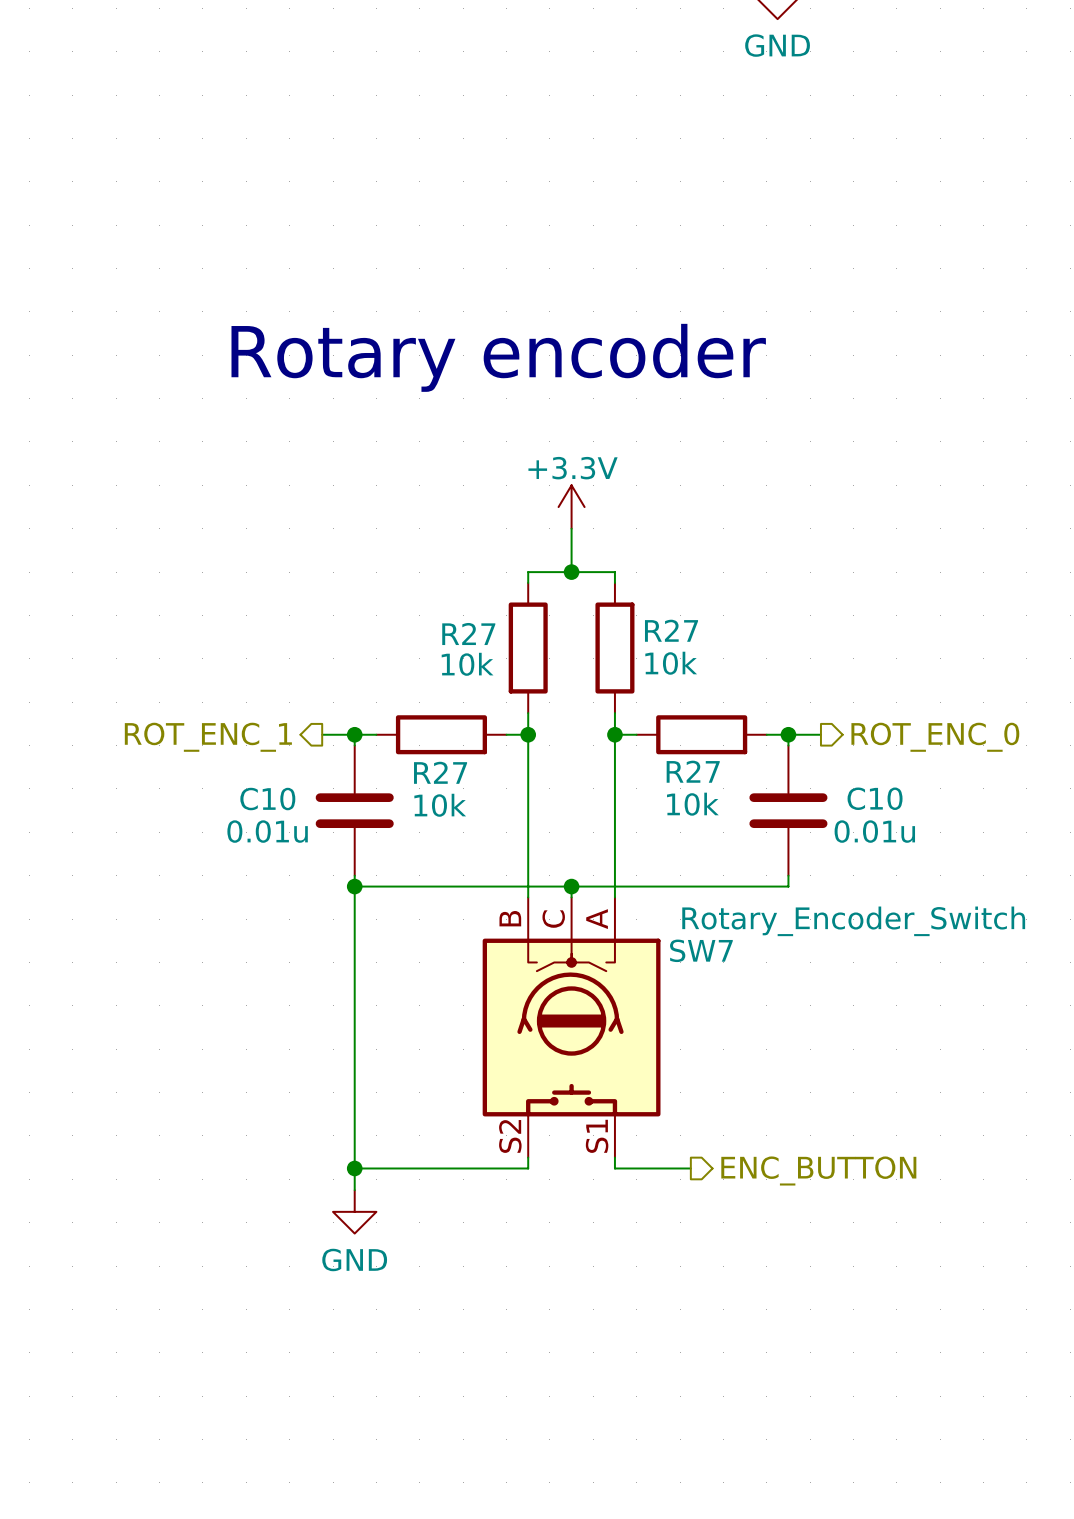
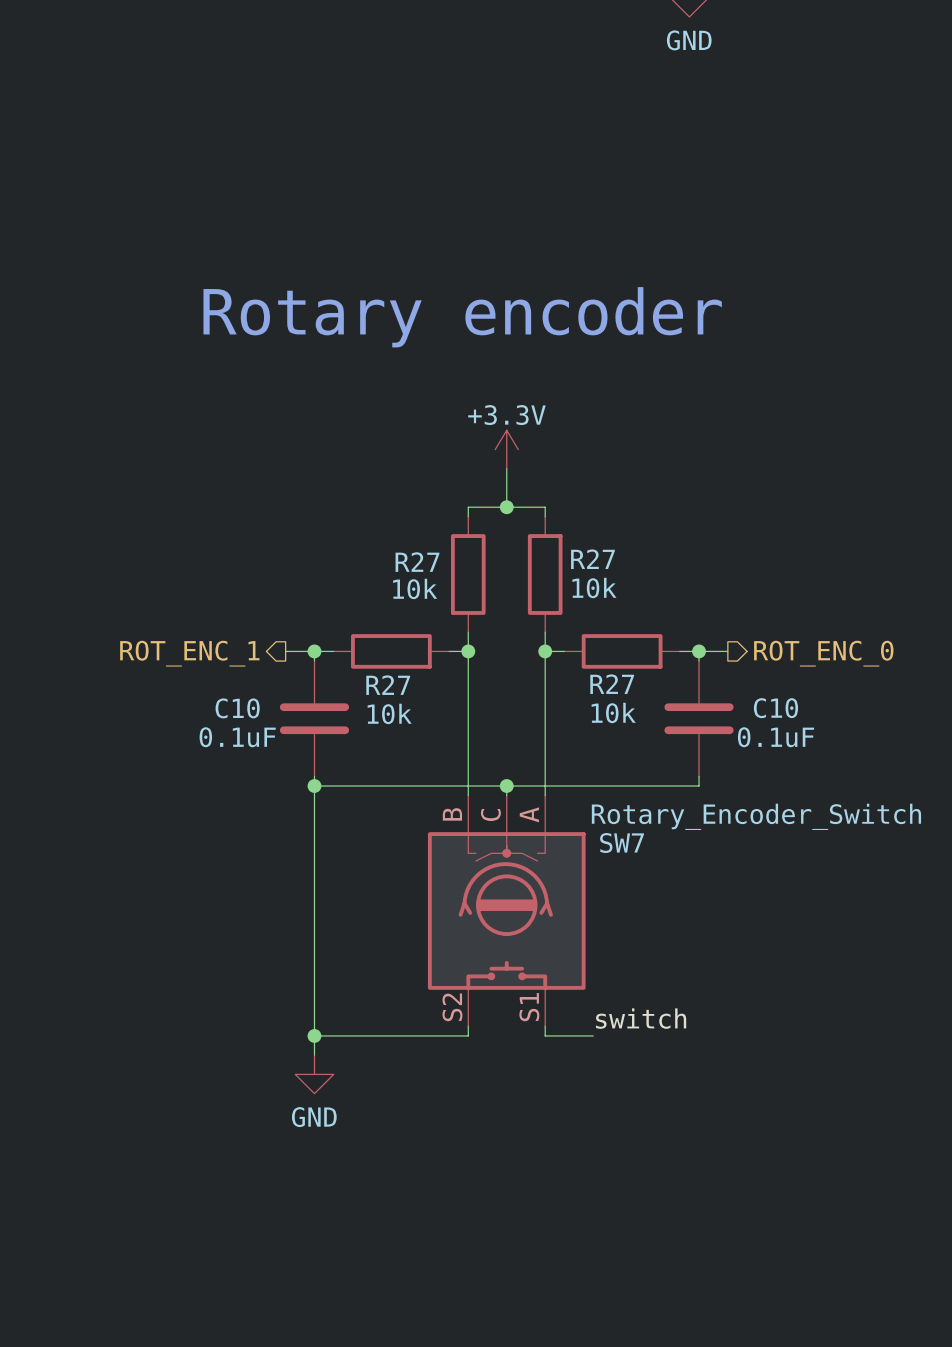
C10 value: 0.01u (267, 831) -> 0.1uF (237, 737)
C10 value: 0.01u (874, 831) -> 0.1uF (776, 737)
label: none -> switch (641, 1018)
wire: (669, 1168) (690, 1168) -> none
hierarchical label: ENC_BUTTON (818, 1170) -> none

